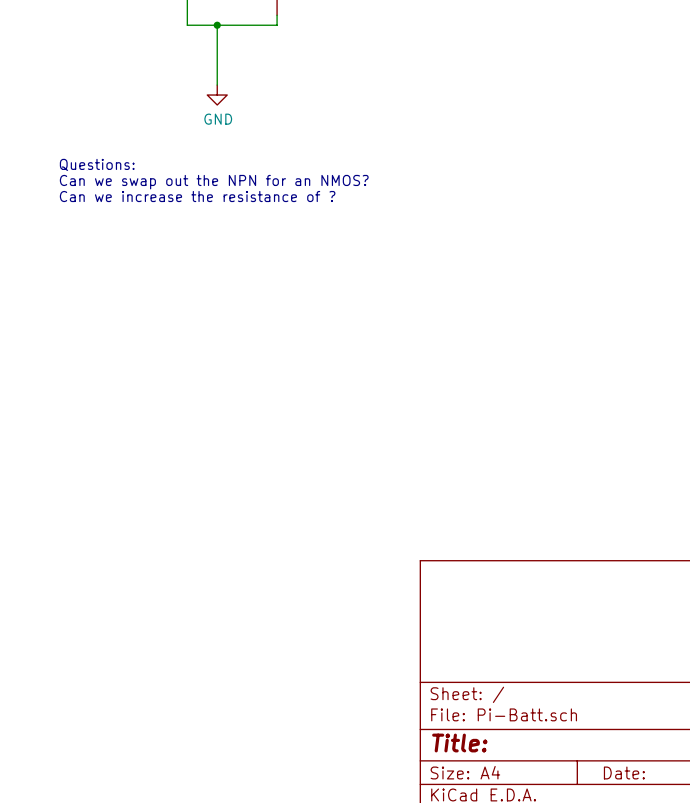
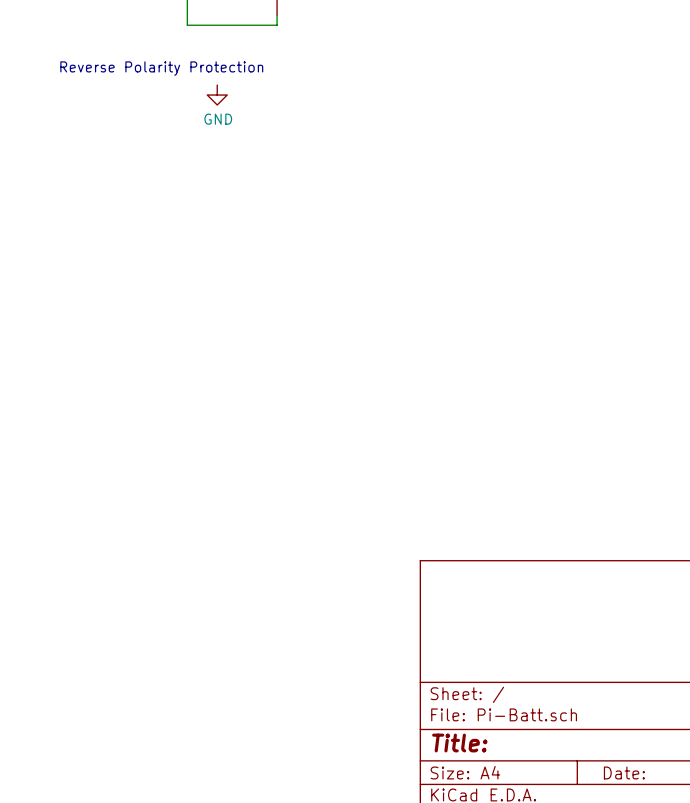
wire: (217, 25) (217, 85) -> none
junction: (217, 25) -> none
text: none -> Reverse Polarity Protection (161, 68)
text: Questions: (97, 164) -> none
text: Can we swap out the NPN for an NMOS? (214, 182) -> none
text: Can we increase the resistance of ? (197, 196) -> none

